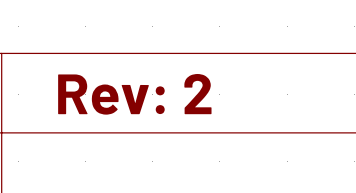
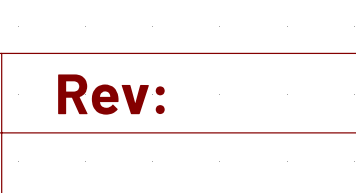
title block: Rev: 2 (134, 94) -> Rev: (111, 94)

